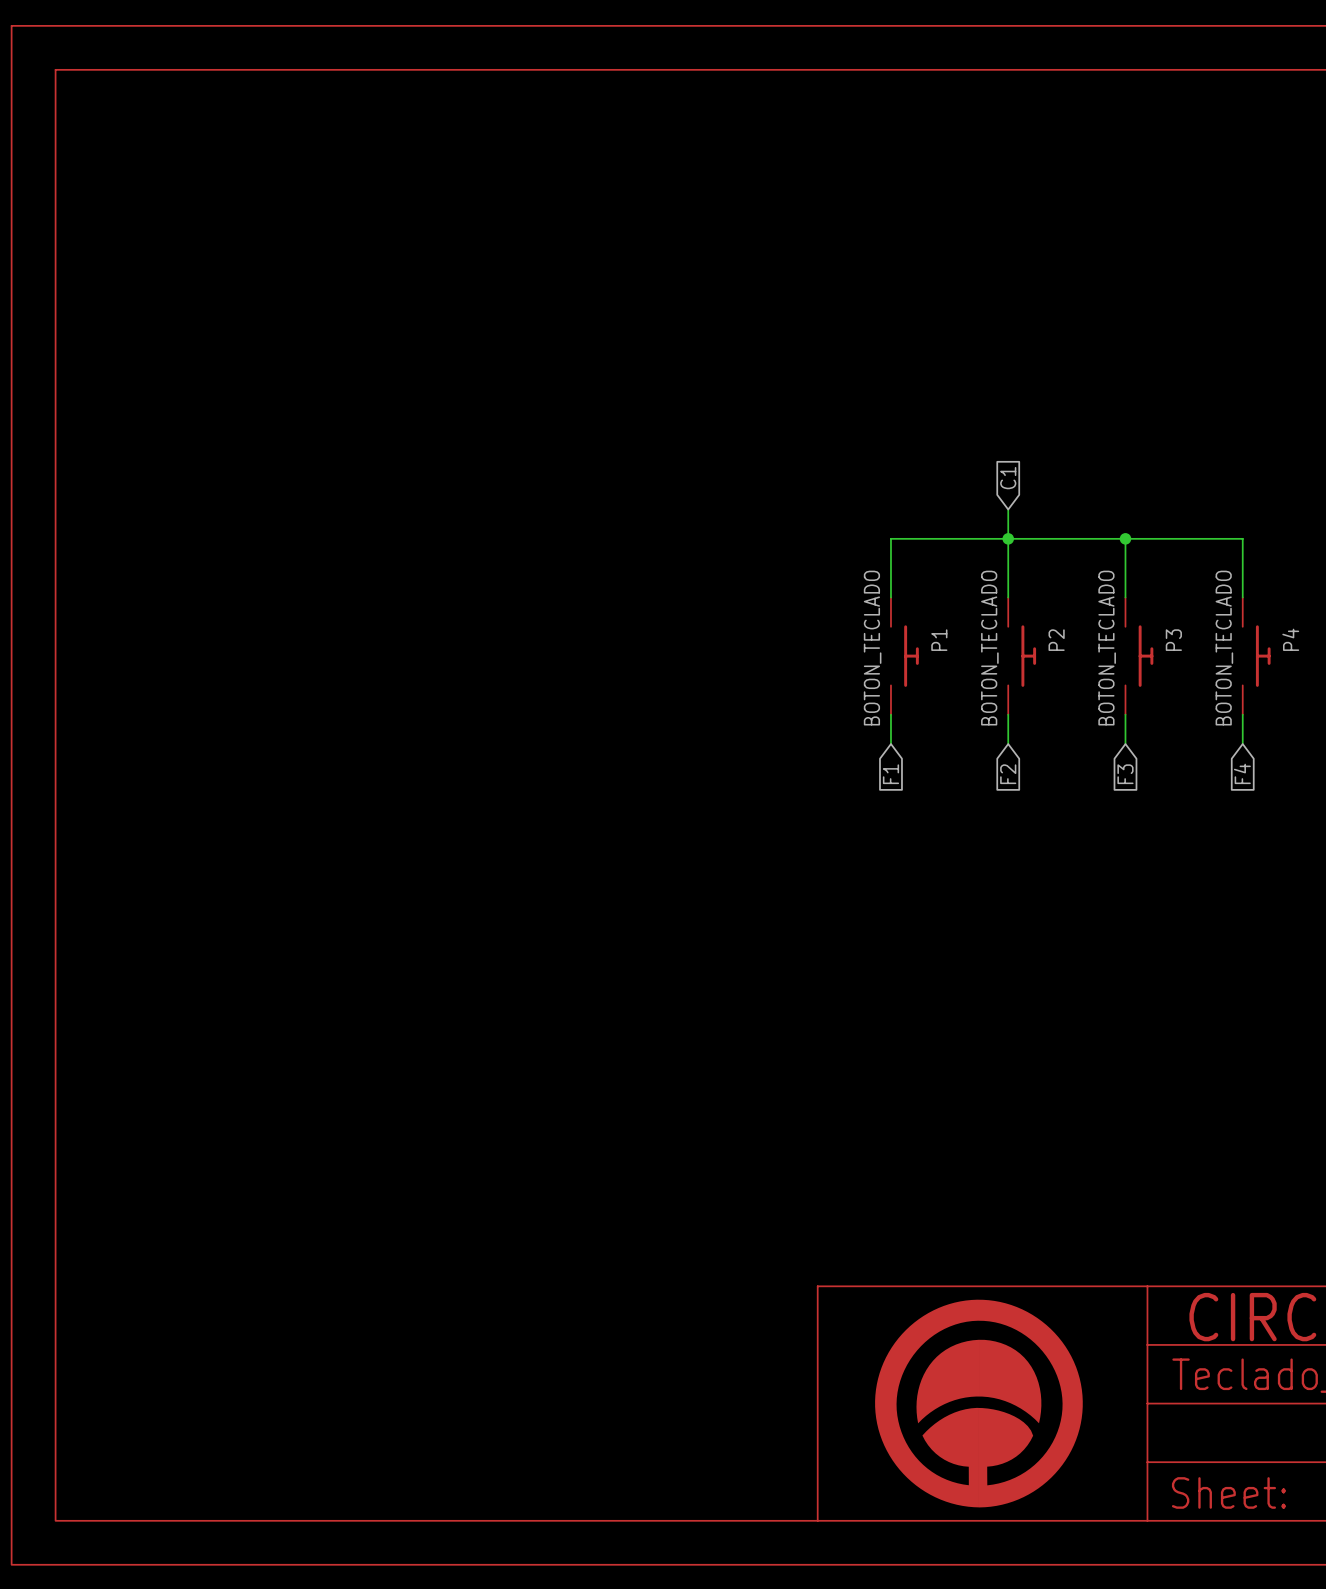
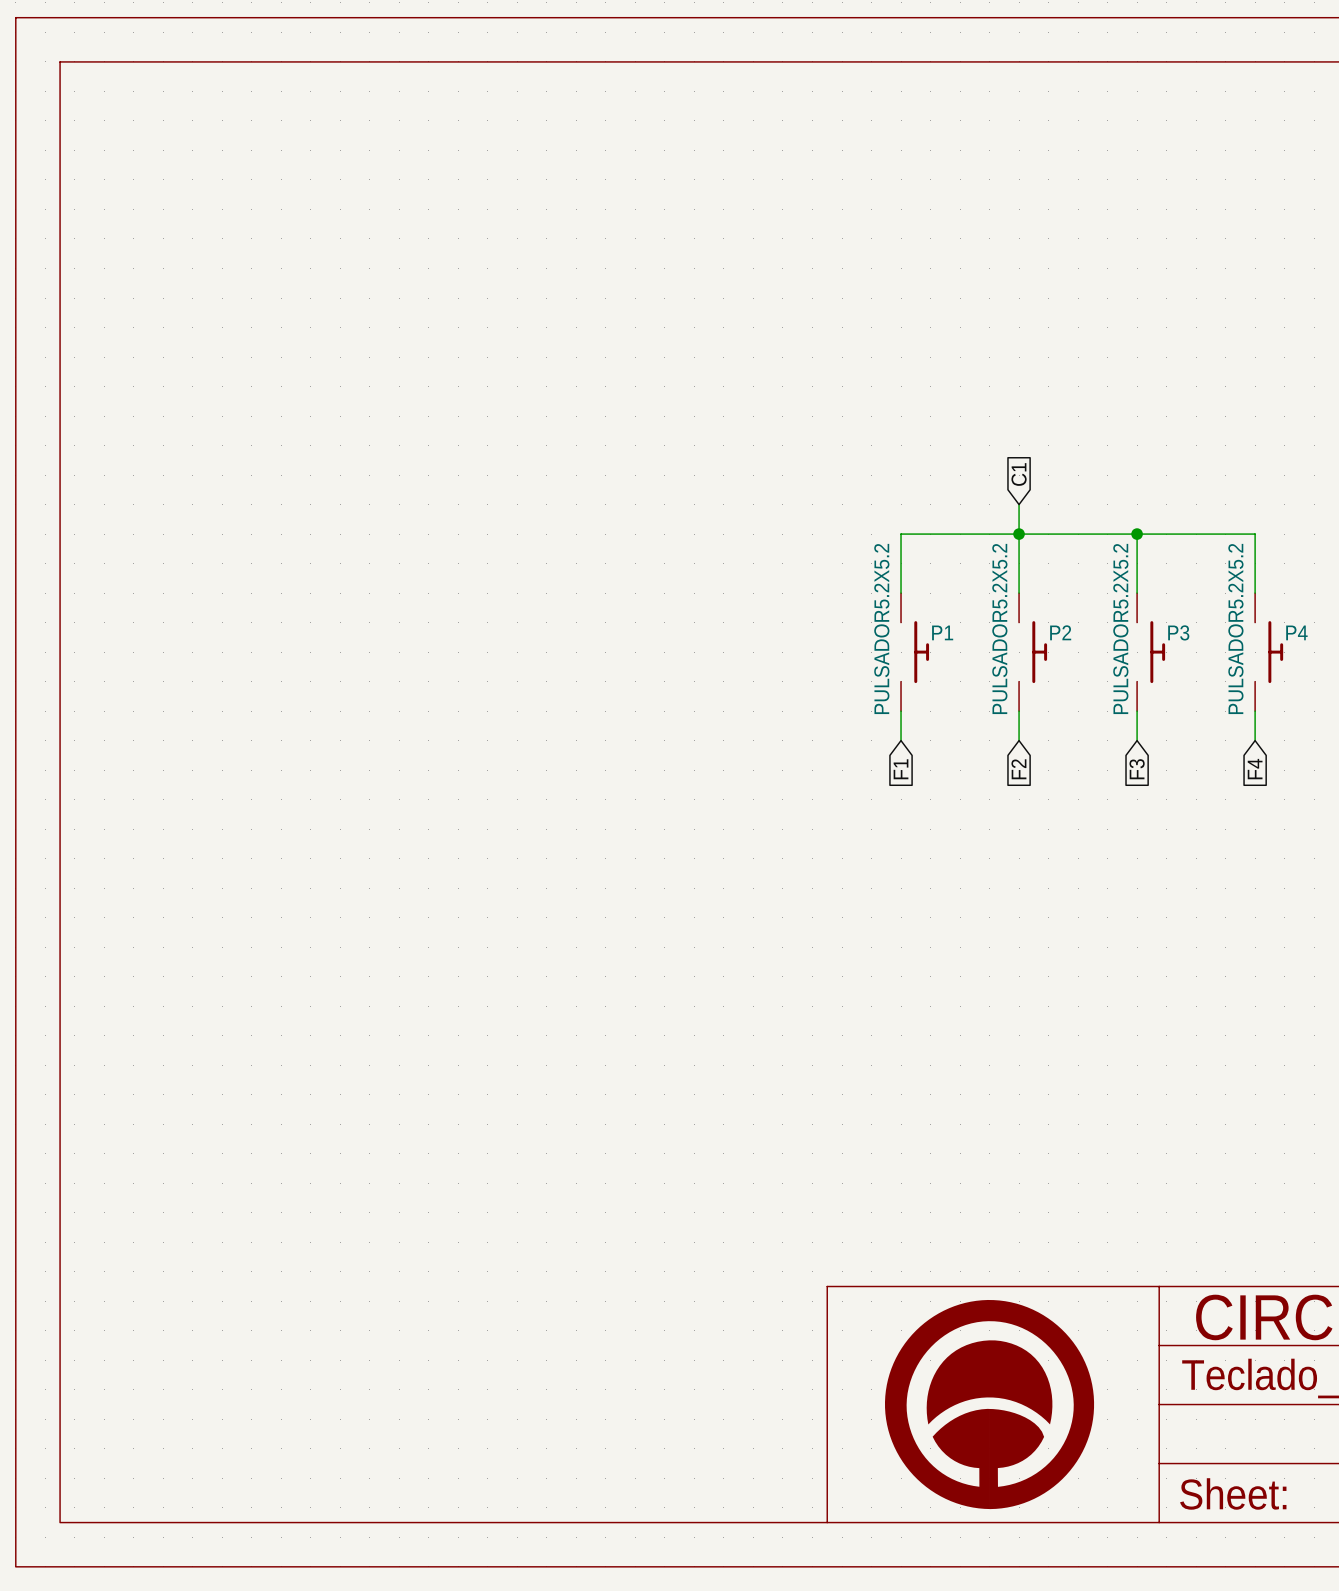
P4 name rotation: 0° (1290, 639) -> 90° clockwise (1296, 632)
P1 name rotation: 0° (939, 640) -> 90° clockwise (942, 632)
P2 name rotation: 0° (1056, 640) -> 90° clockwise (1060, 632)
P3 name rotation: 0° (1173, 640) -> 90° clockwise (1178, 632)
P1 value: BOTON_TECLADO (872, 648) -> PULSADOR5.2X5.2 (881, 628)
P2 value: BOTON_TECLADO (989, 648) -> PULSADOR5.2X5.2 (999, 628)
P3 value: BOTON_TECLADO (1107, 648) -> PULSADOR5.2X5.2 (1120, 628)
P4 value: BOTON_TECLADO (1224, 648) -> PULSADOR5.2X5.2 (1235, 628)

